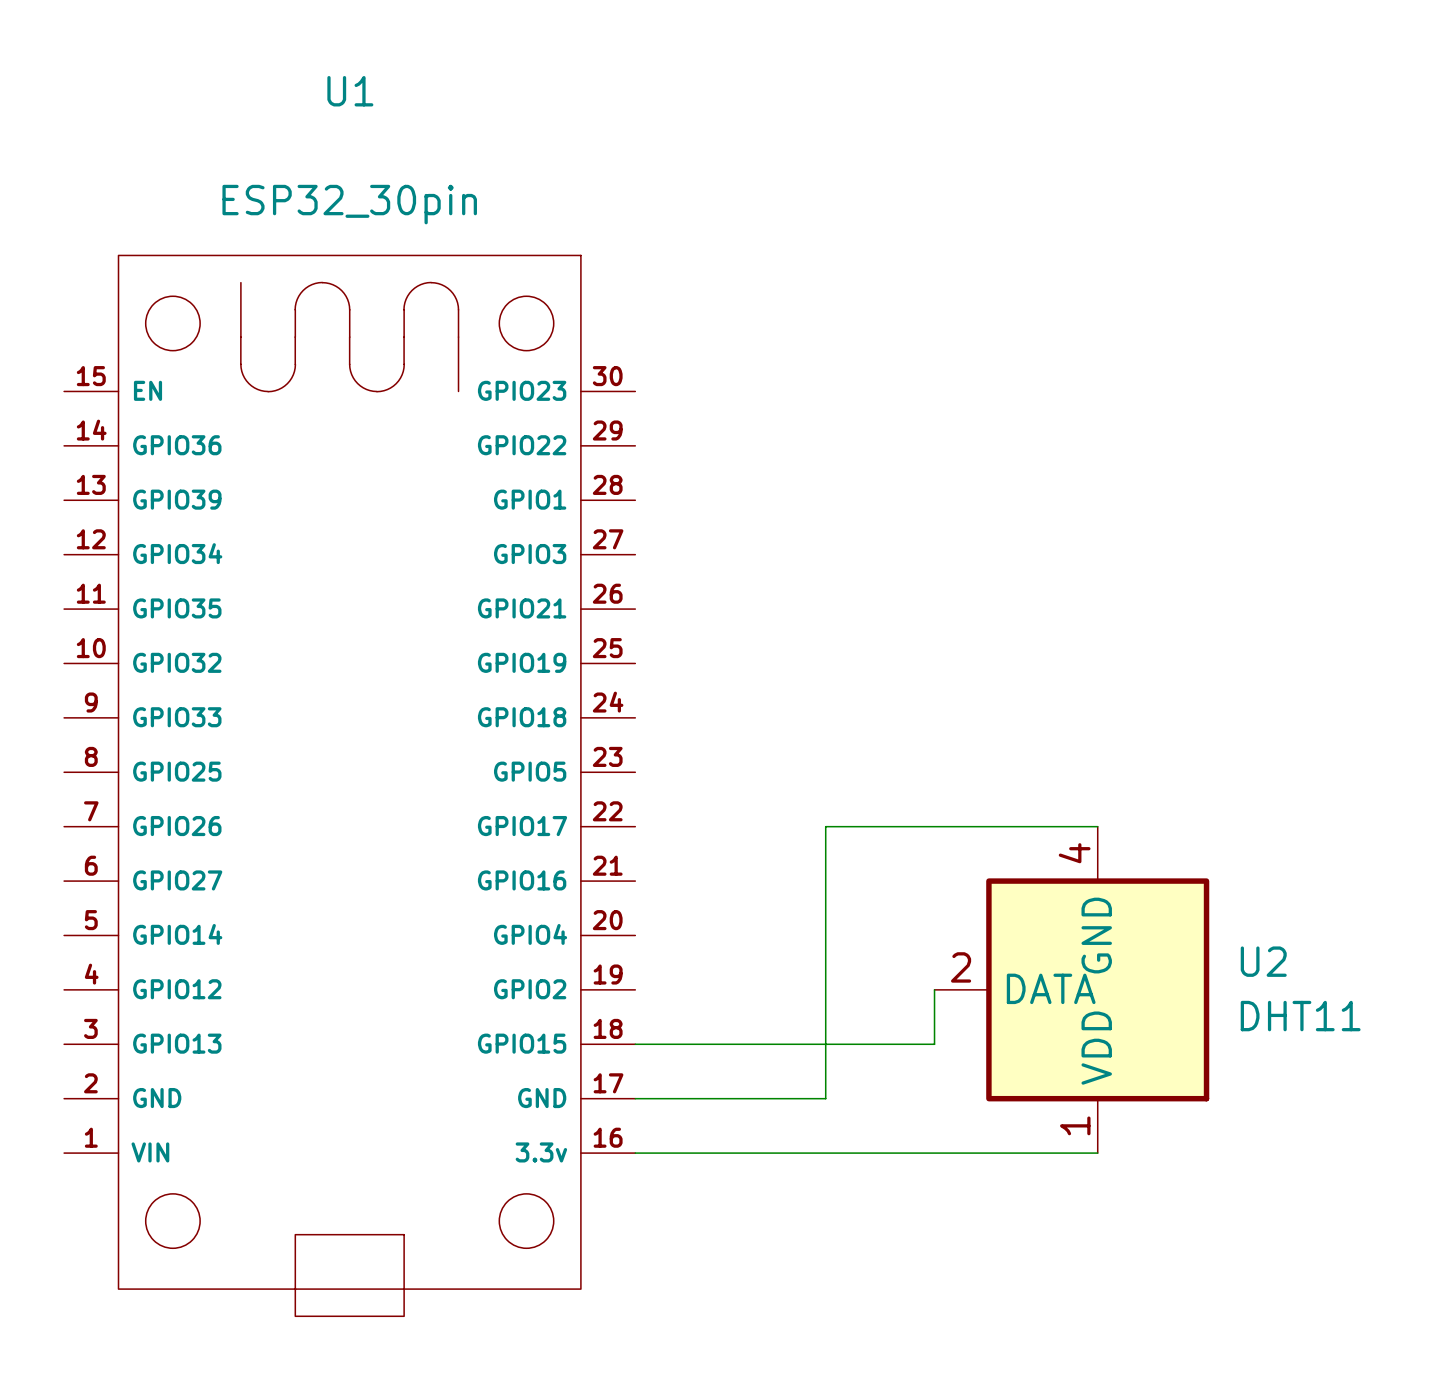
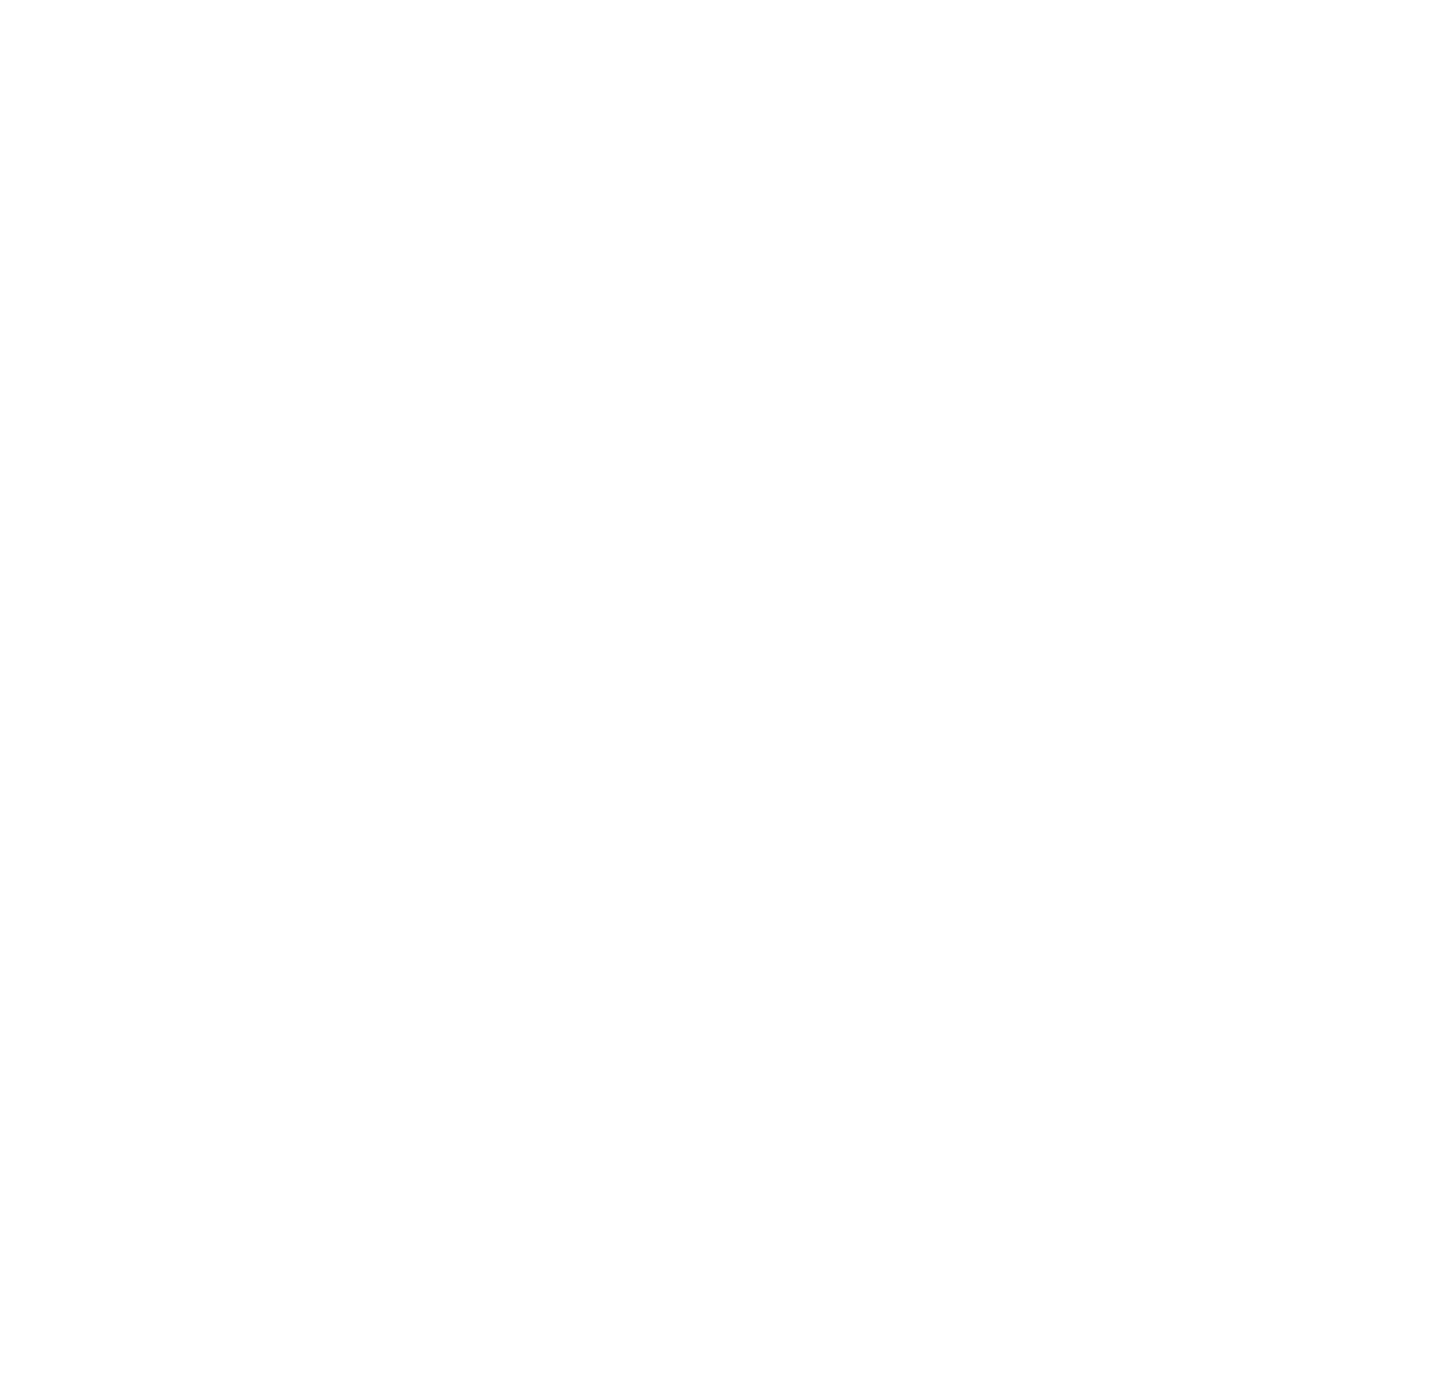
U1: (349, 785) -> none
wire: (1097, 826) (825, 826) (825, 1098) (635, 1098) -> none
wire: (934, 989) (934, 1044) (635, 1044) -> none
U2: DHT11 (1071, 989) -> none
wire: (635, 1153) (1097, 1153) -> none

